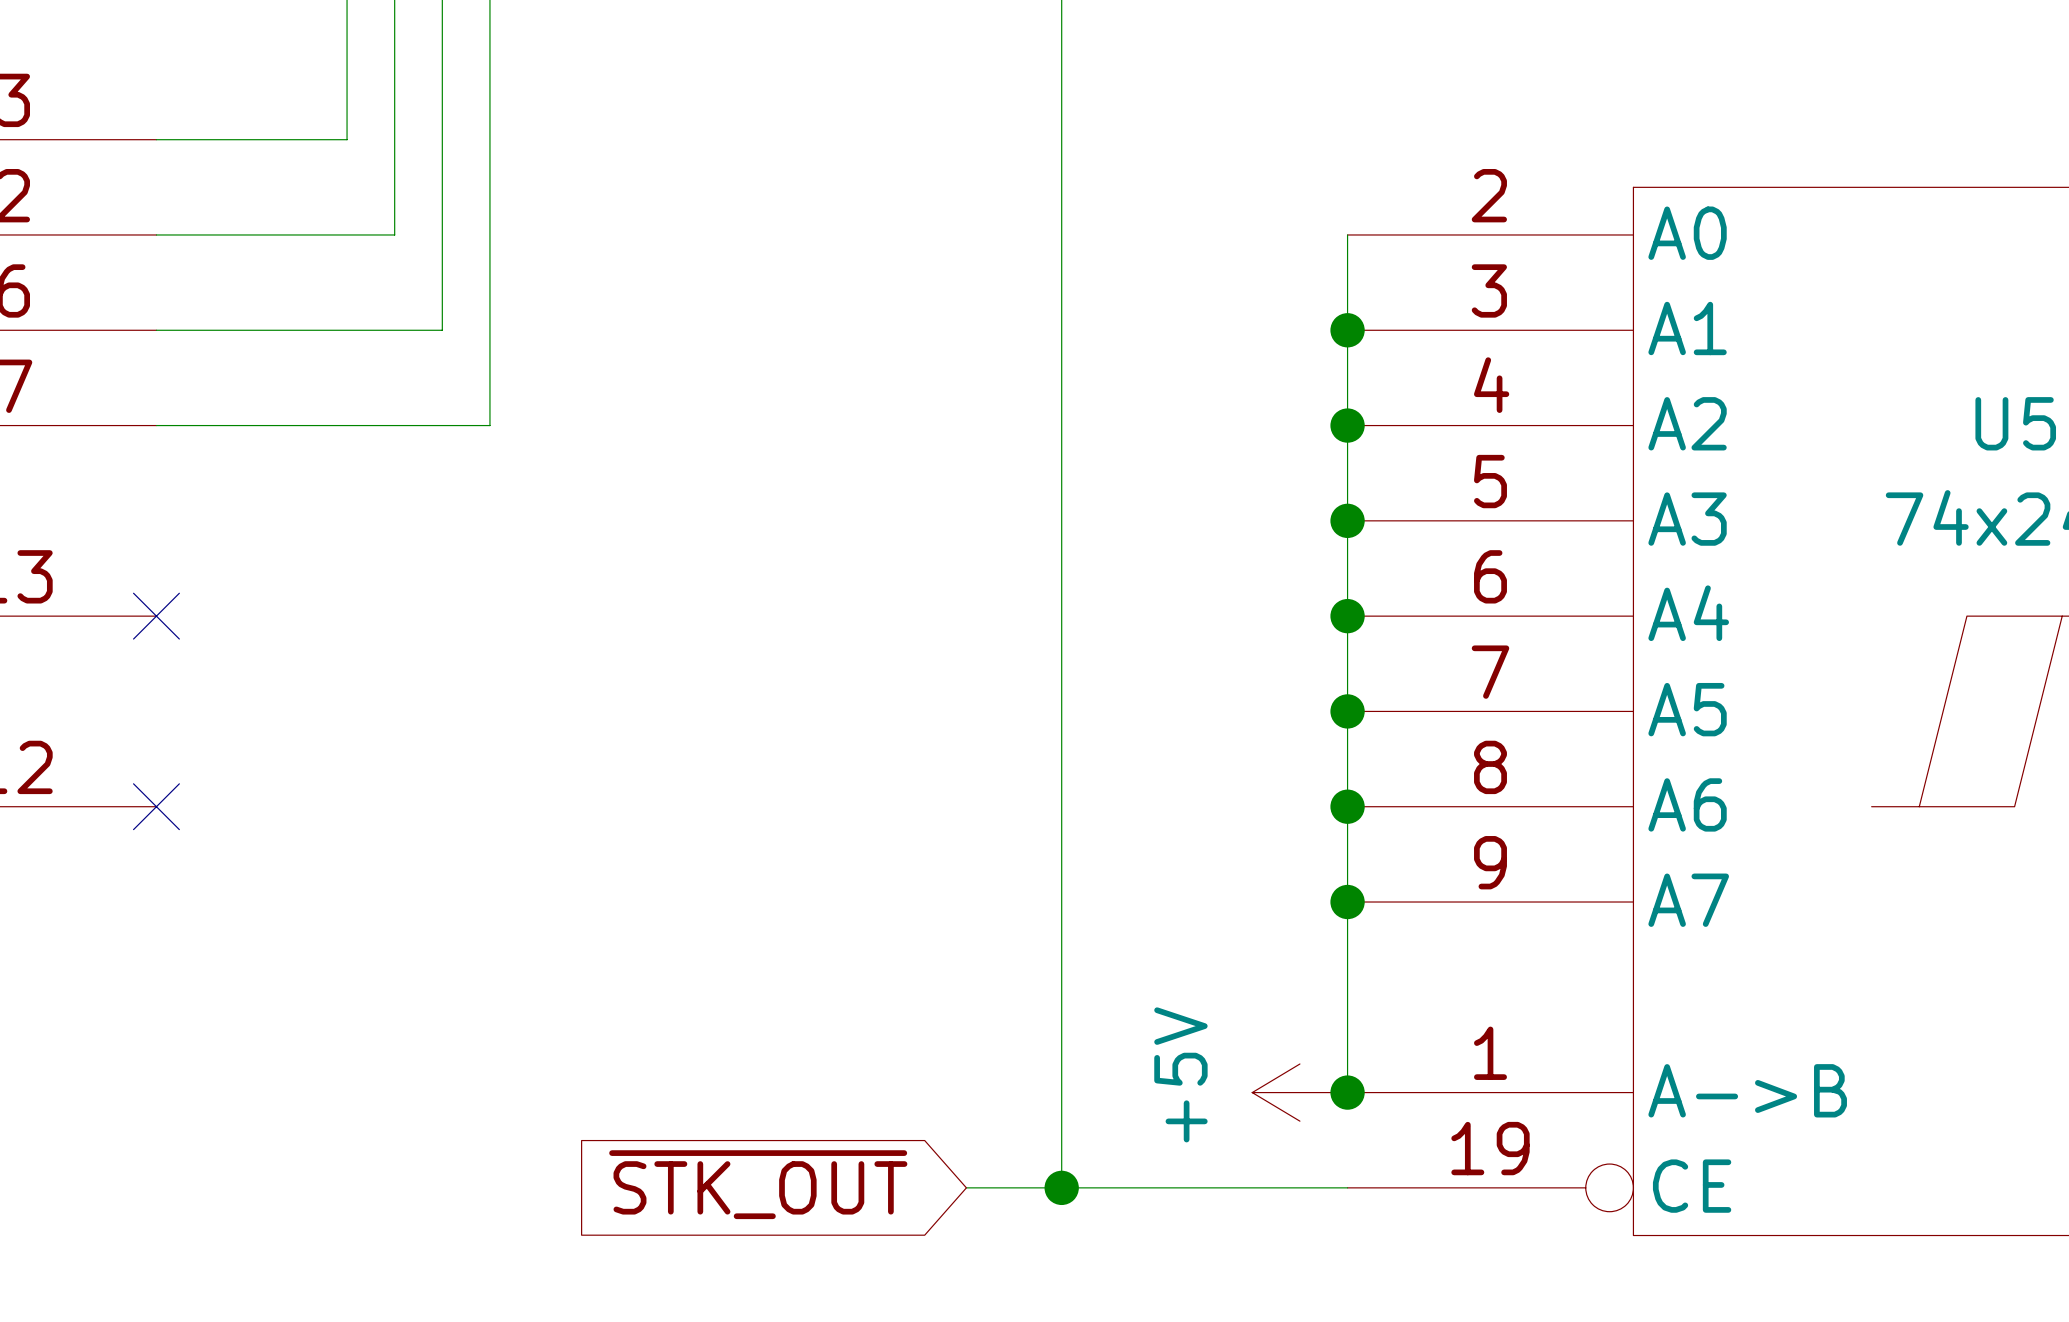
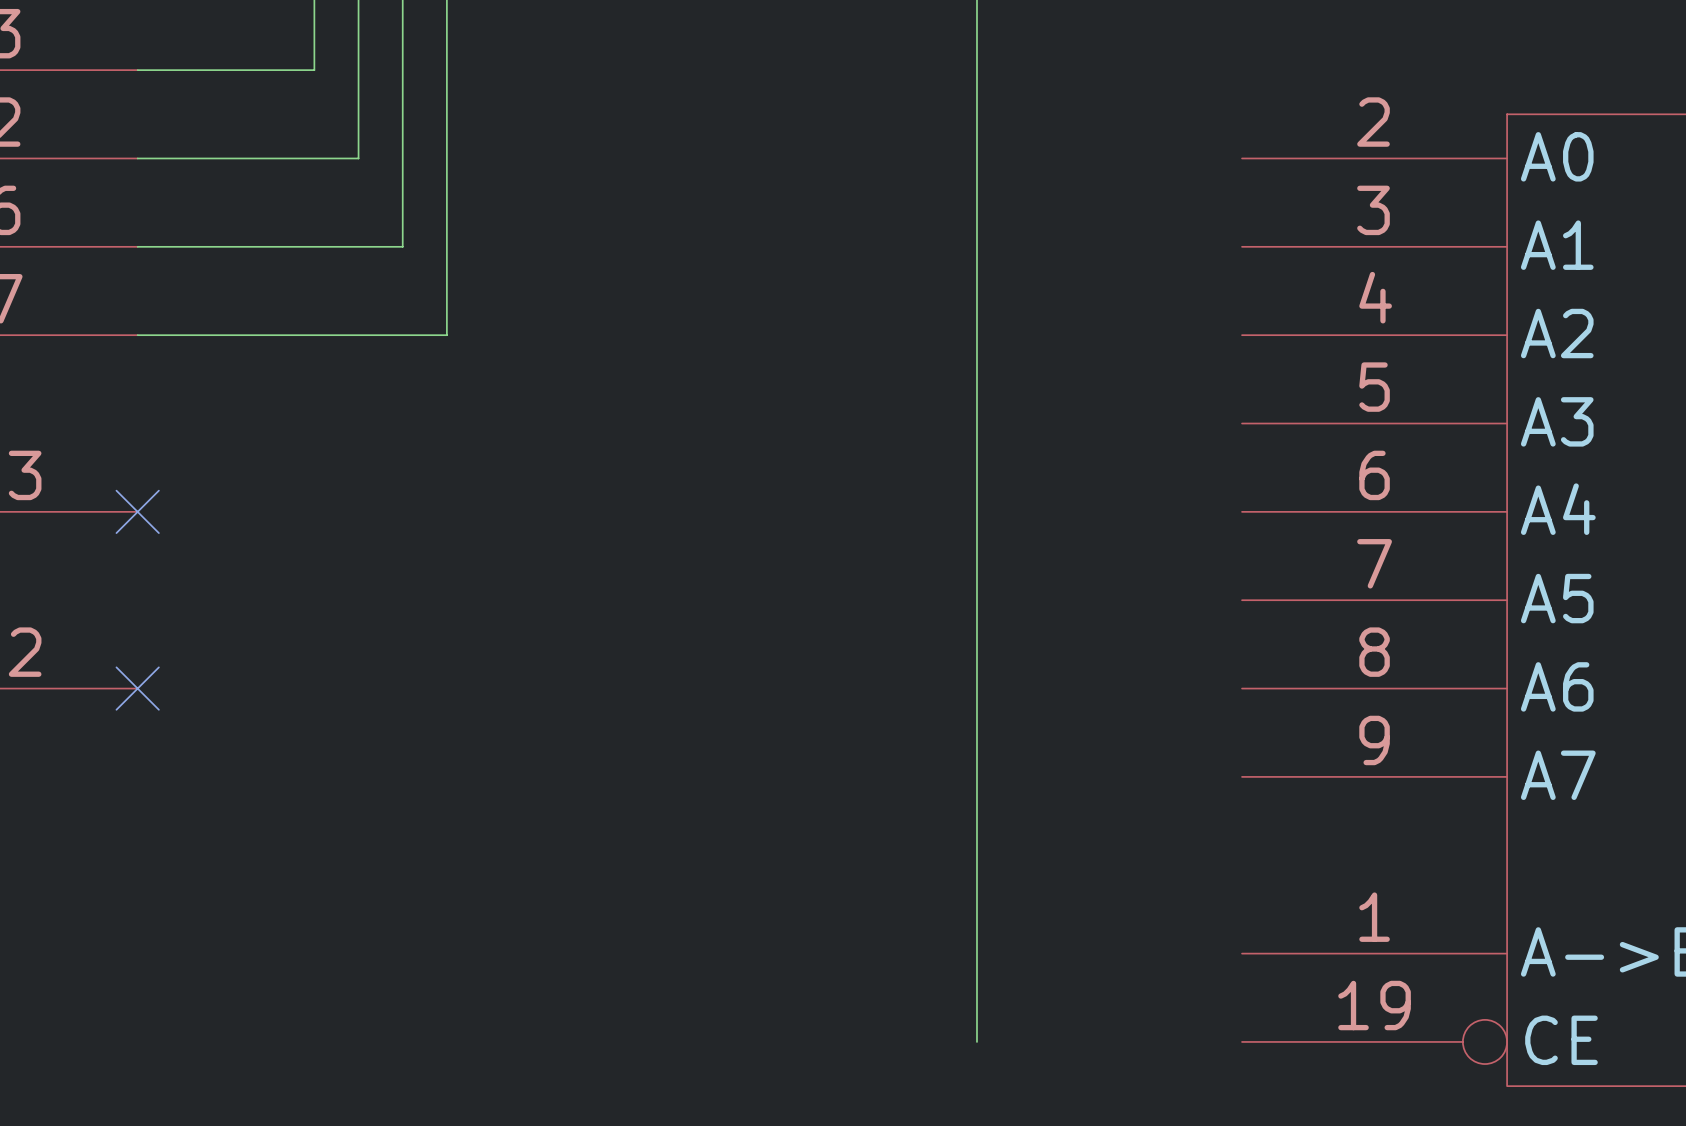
wire: (1347, 234) (1347, 1092) -> none
junction: (1347, 330) -> none
junction: (1347, 425) -> none
junction: (1347, 520) -> none
junction: (1347, 616) -> none
junction: (1347, 711) -> none
junction: (1347, 806) -> none
junction: (1347, 902) -> none
power symbol: +5V (1299, 1092) -> none
junction: (1347, 1092) -> none
global label: ~{STK_OUT} (758, 1184) -> none
wire: (966, 1187) (1347, 1187) -> none
junction: (1061, 1187) -> none

